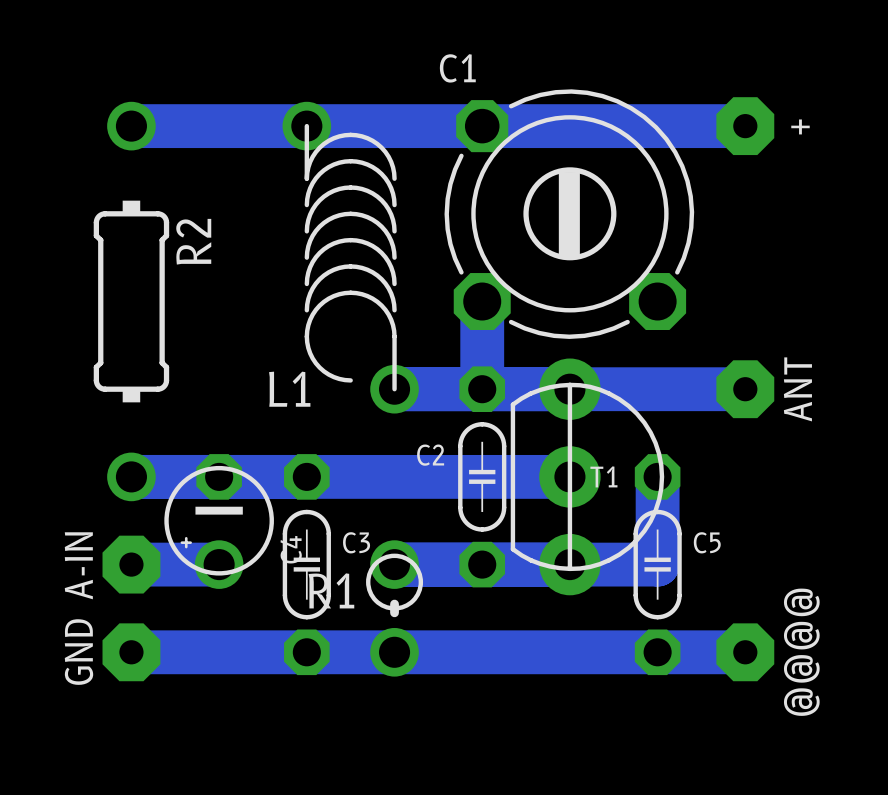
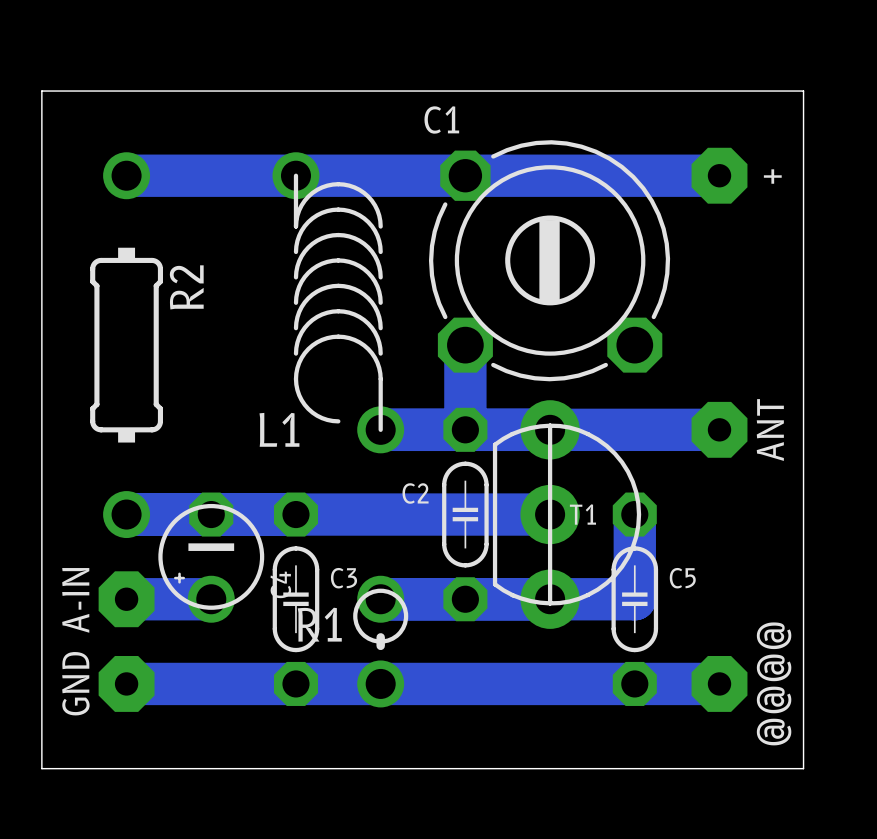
board edge: none -> (41, 91) (803, 91) (803, 768) (41, 768) (41, 91)

